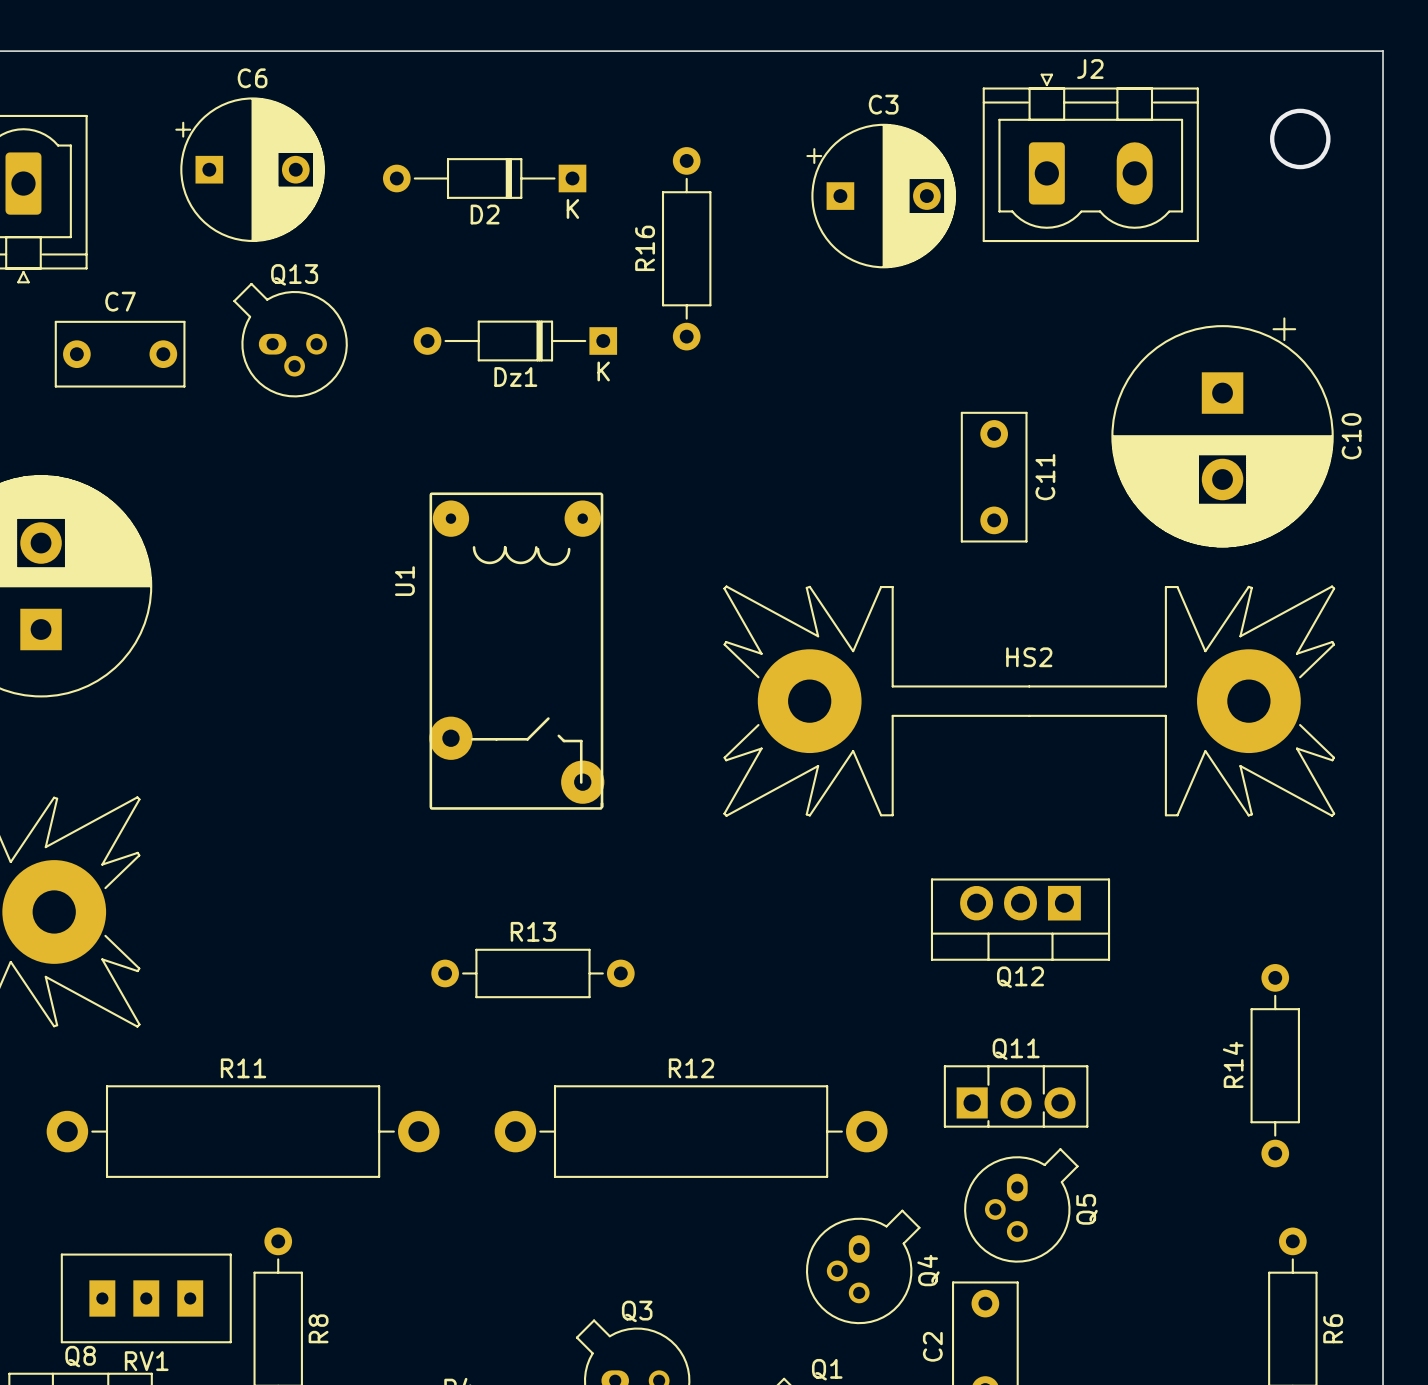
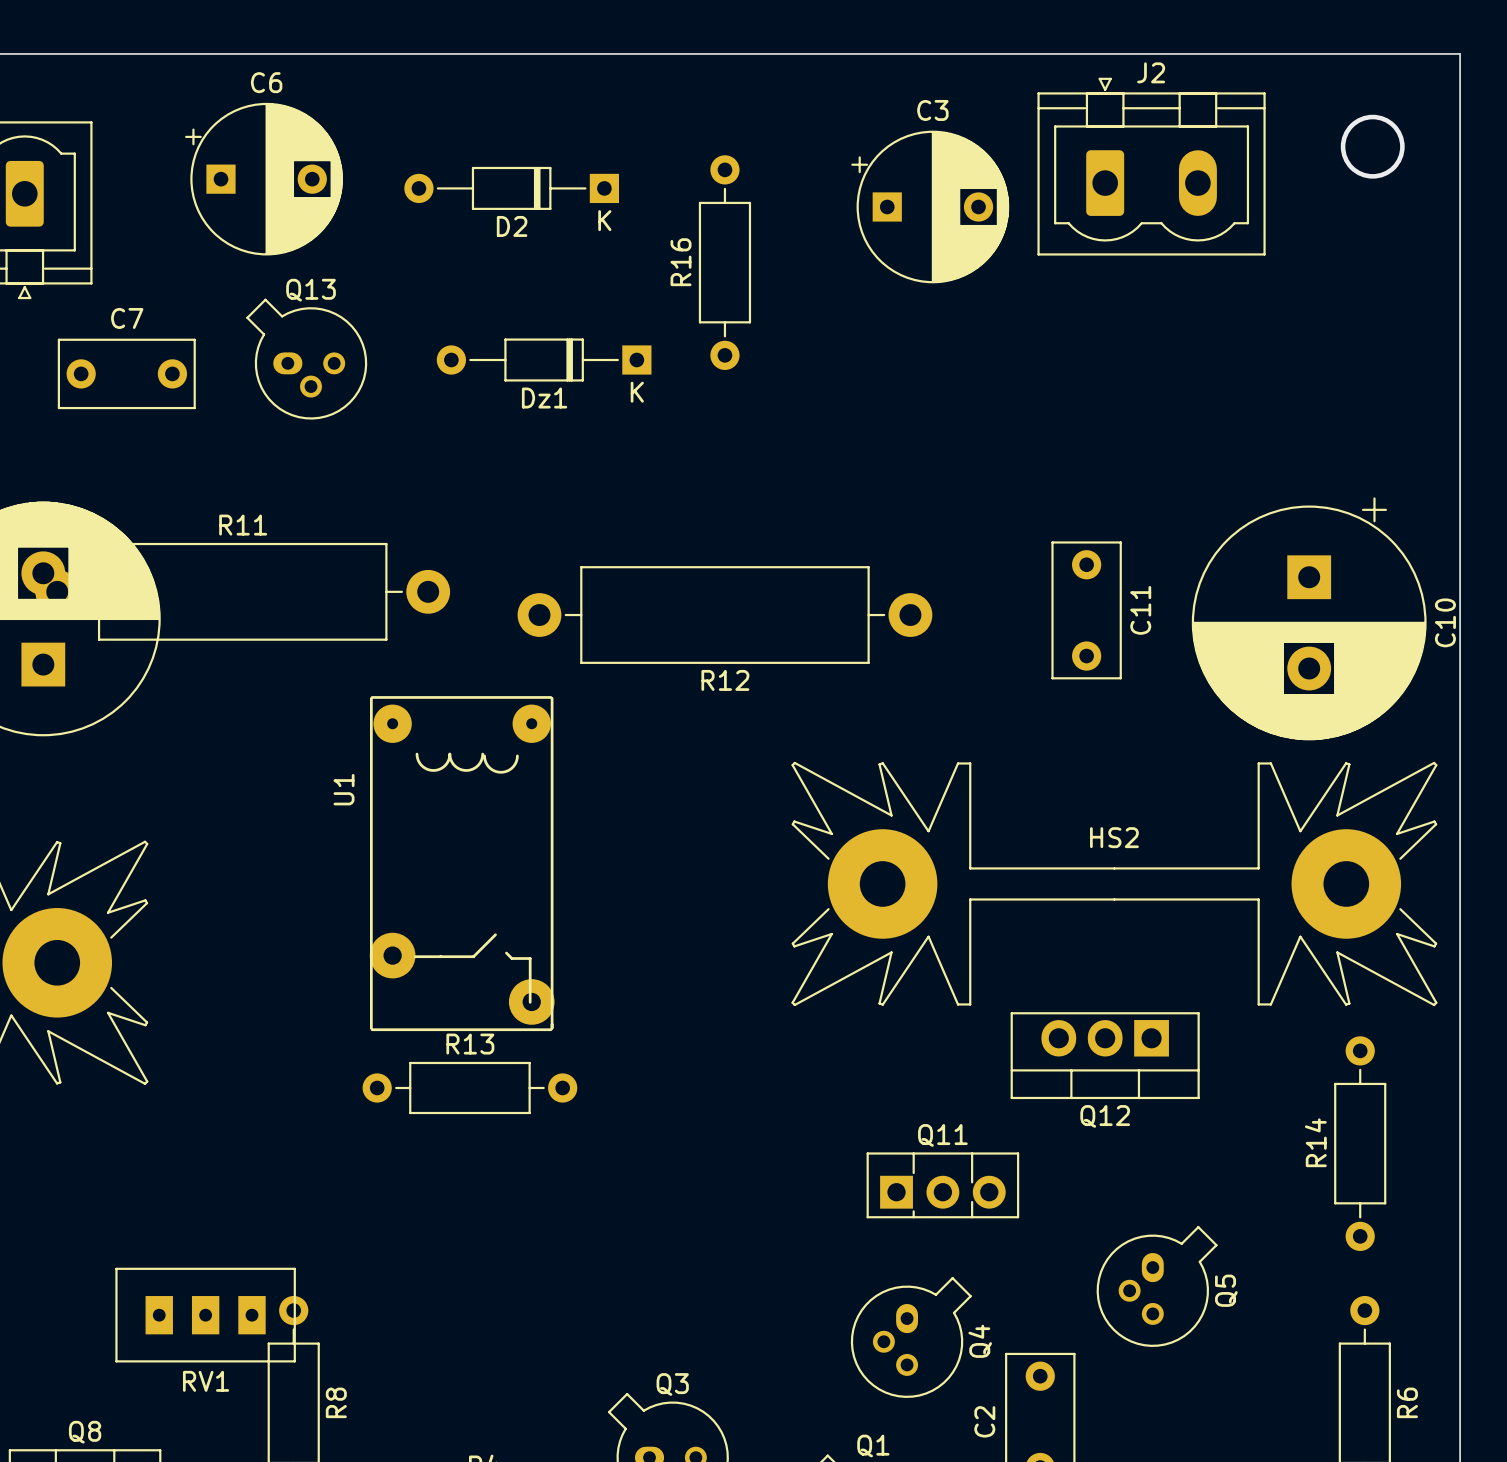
C10 position: (1222, 432) -> (1309, 618)
C11 position: (994, 477) -> (1086, 610)
U1 position: (516, 651) -> (462, 863)
HS2 position: (1029, 701) -> (1114, 883)
Q12 position: (1020, 919) -> (1105, 1055)
R13 position: (532, 973) -> (469, 1087)
R14 position: (1275, 1065) -> (1360, 1143)
R12 name position: R12 (691, 1068) -> R12 (725, 680)
Q11 position: (1016, 1096) -> (942, 1185)
R11 position: (243, 1131) -> (242, 591)
R12 position: (691, 1131) -> (724, 615)
Q5 position: (1021, 1205) -> (1157, 1286)
RV1 position: (146, 1298) -> (205, 1315)

